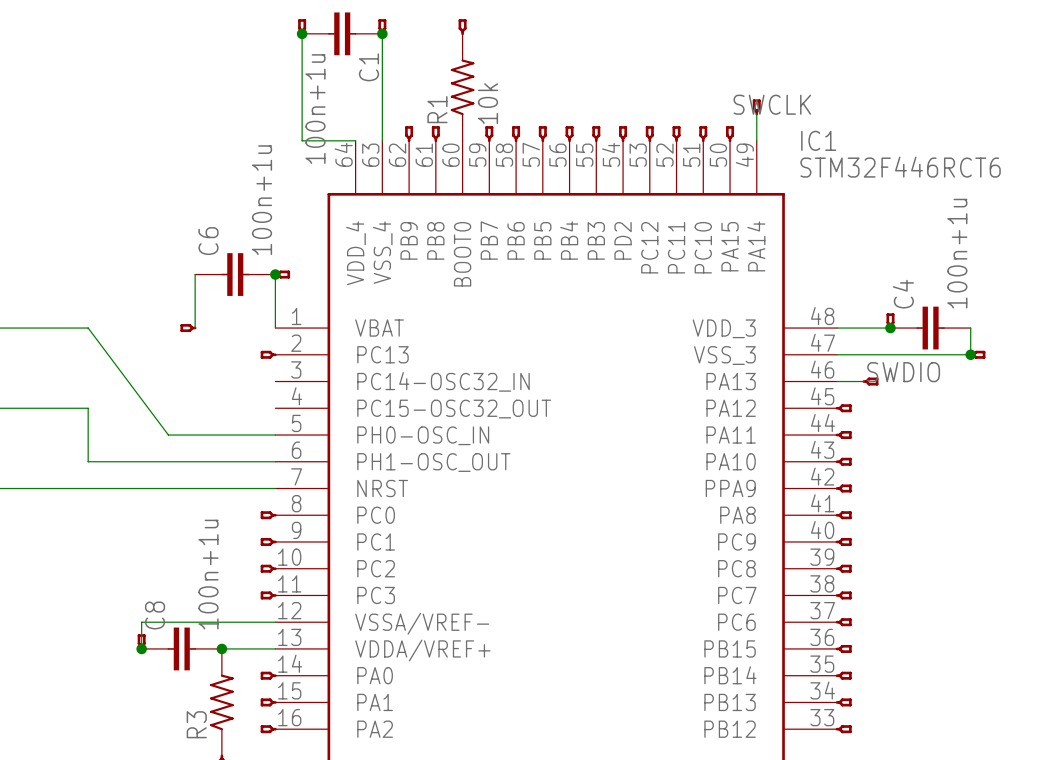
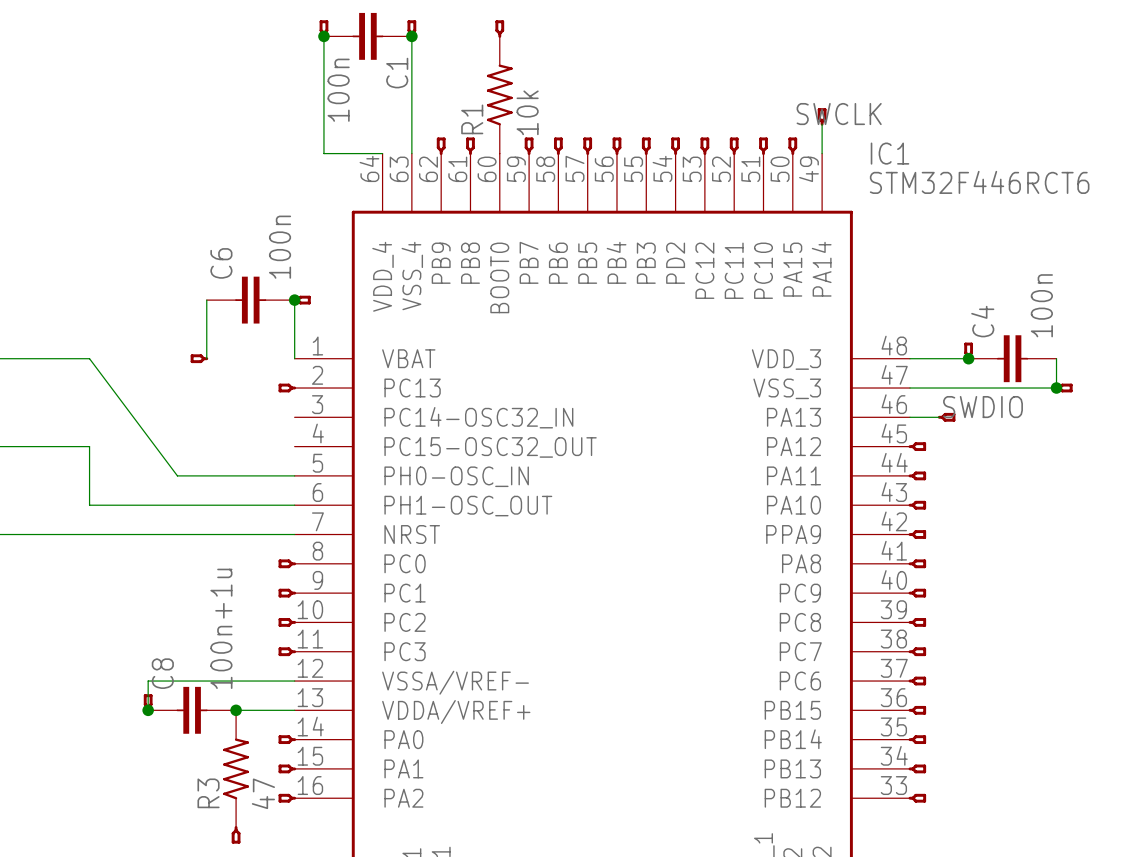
C1 value: 100n+1u (315, 109) -> 100n (338, 90)
C6 value: 100n+1u (262, 200) -> 100n (280, 247)
C4 value: 100n+1u (957, 253) -> 100n (1041, 305)
R3 value: none -> 47 (263, 793)

